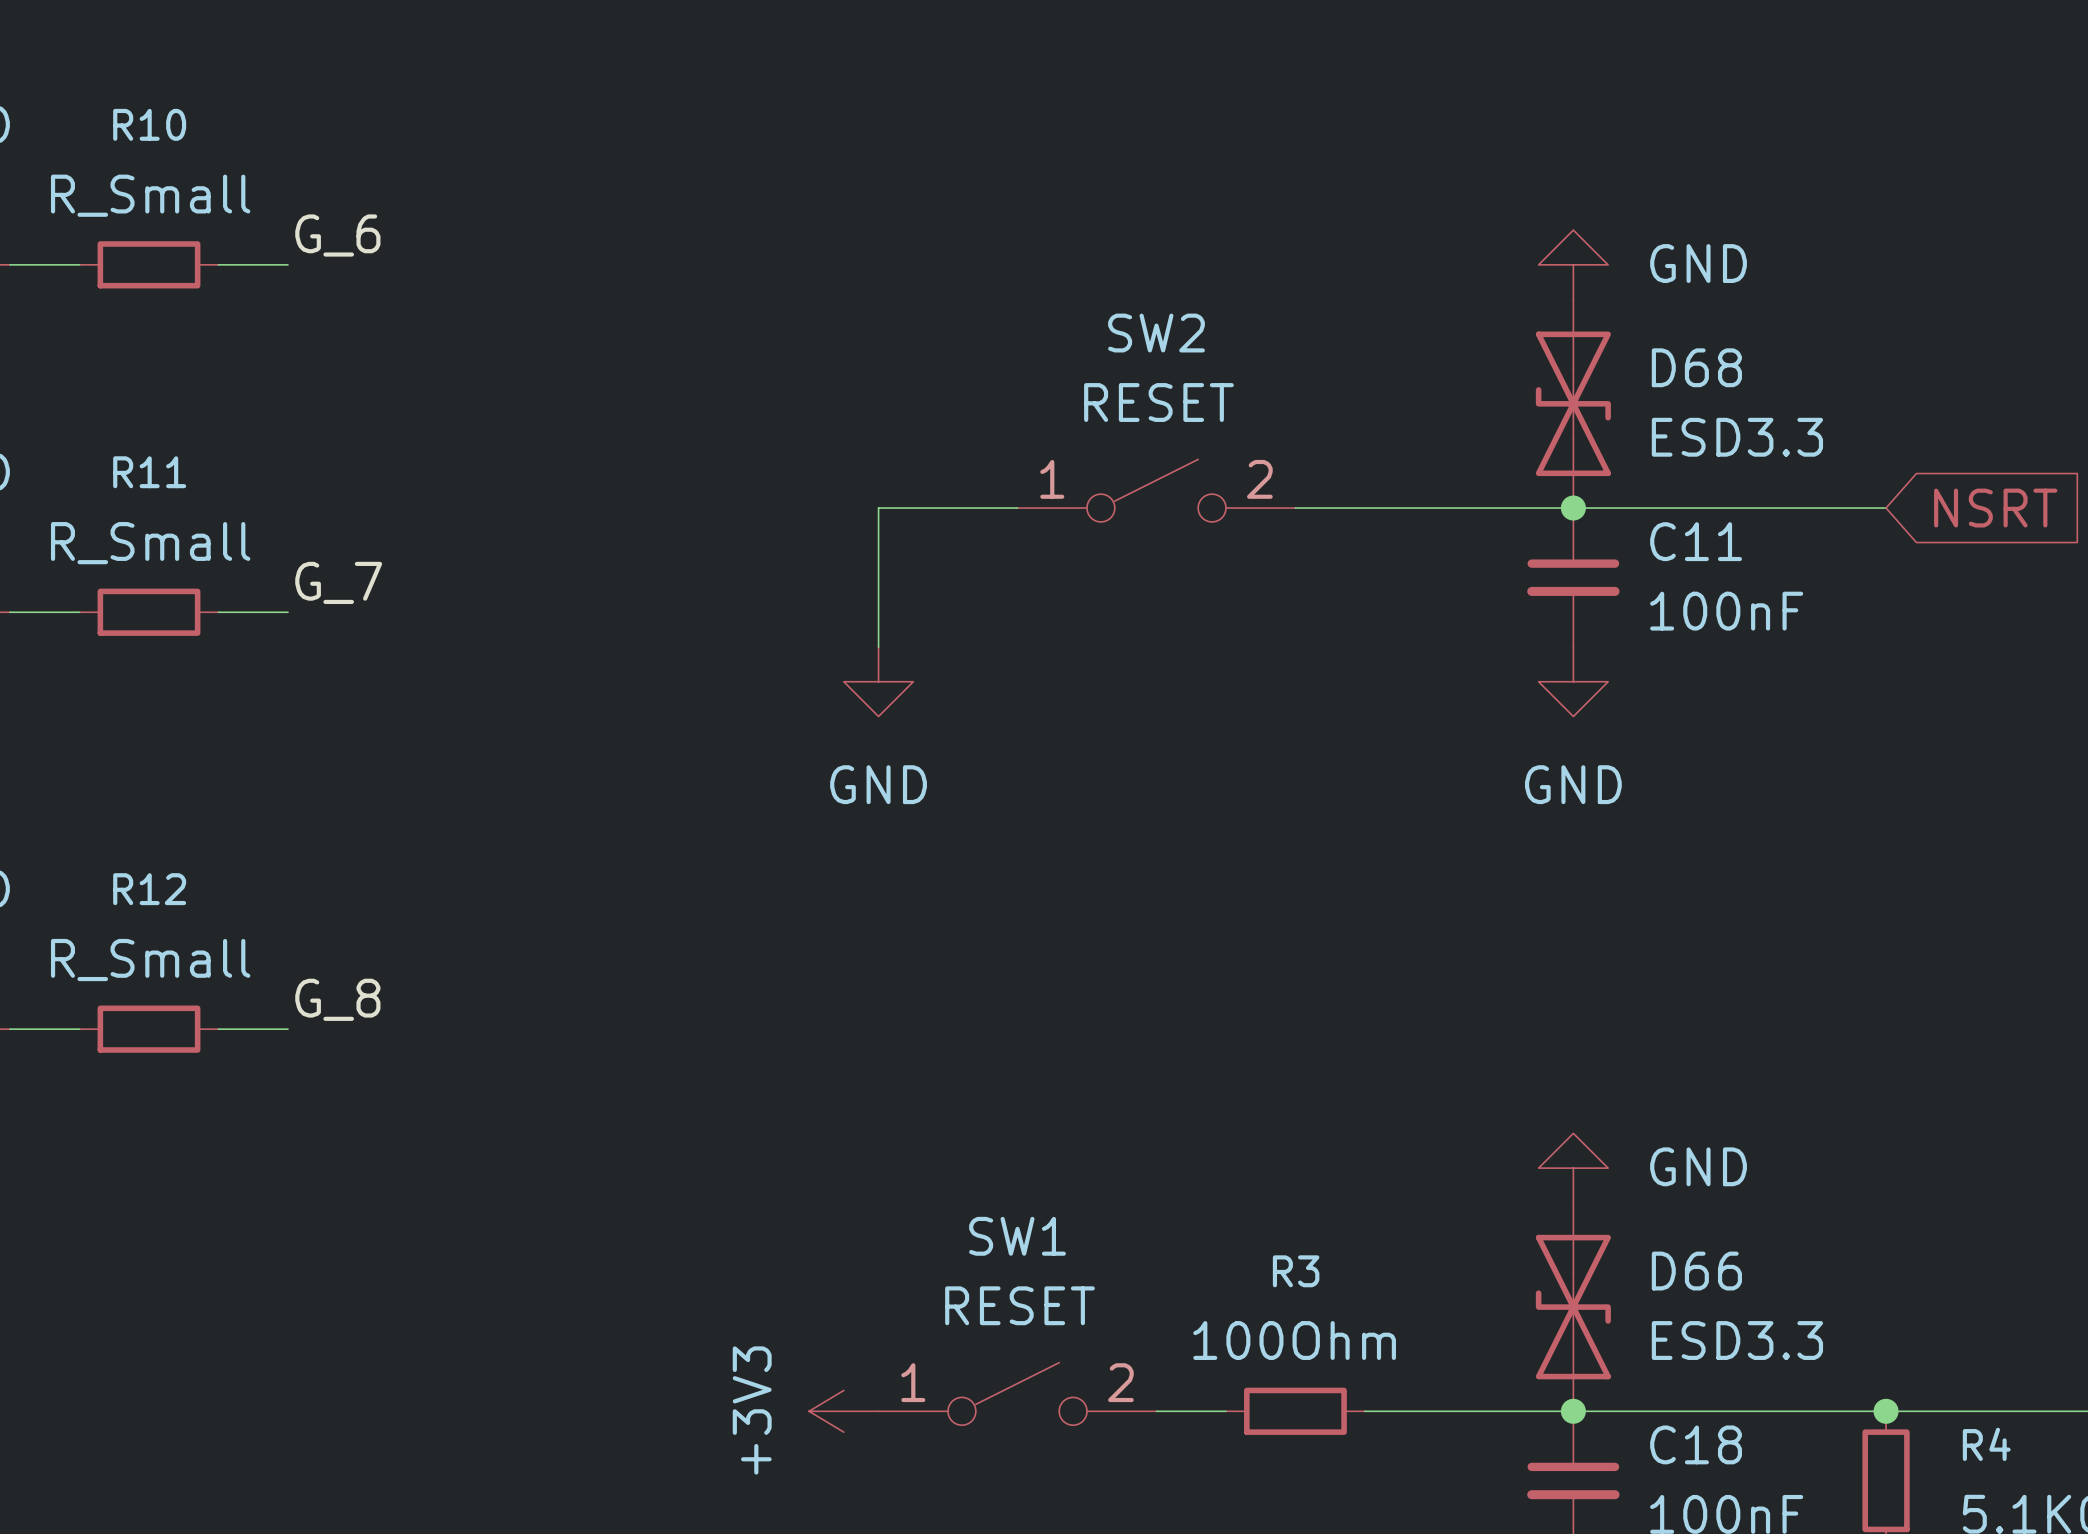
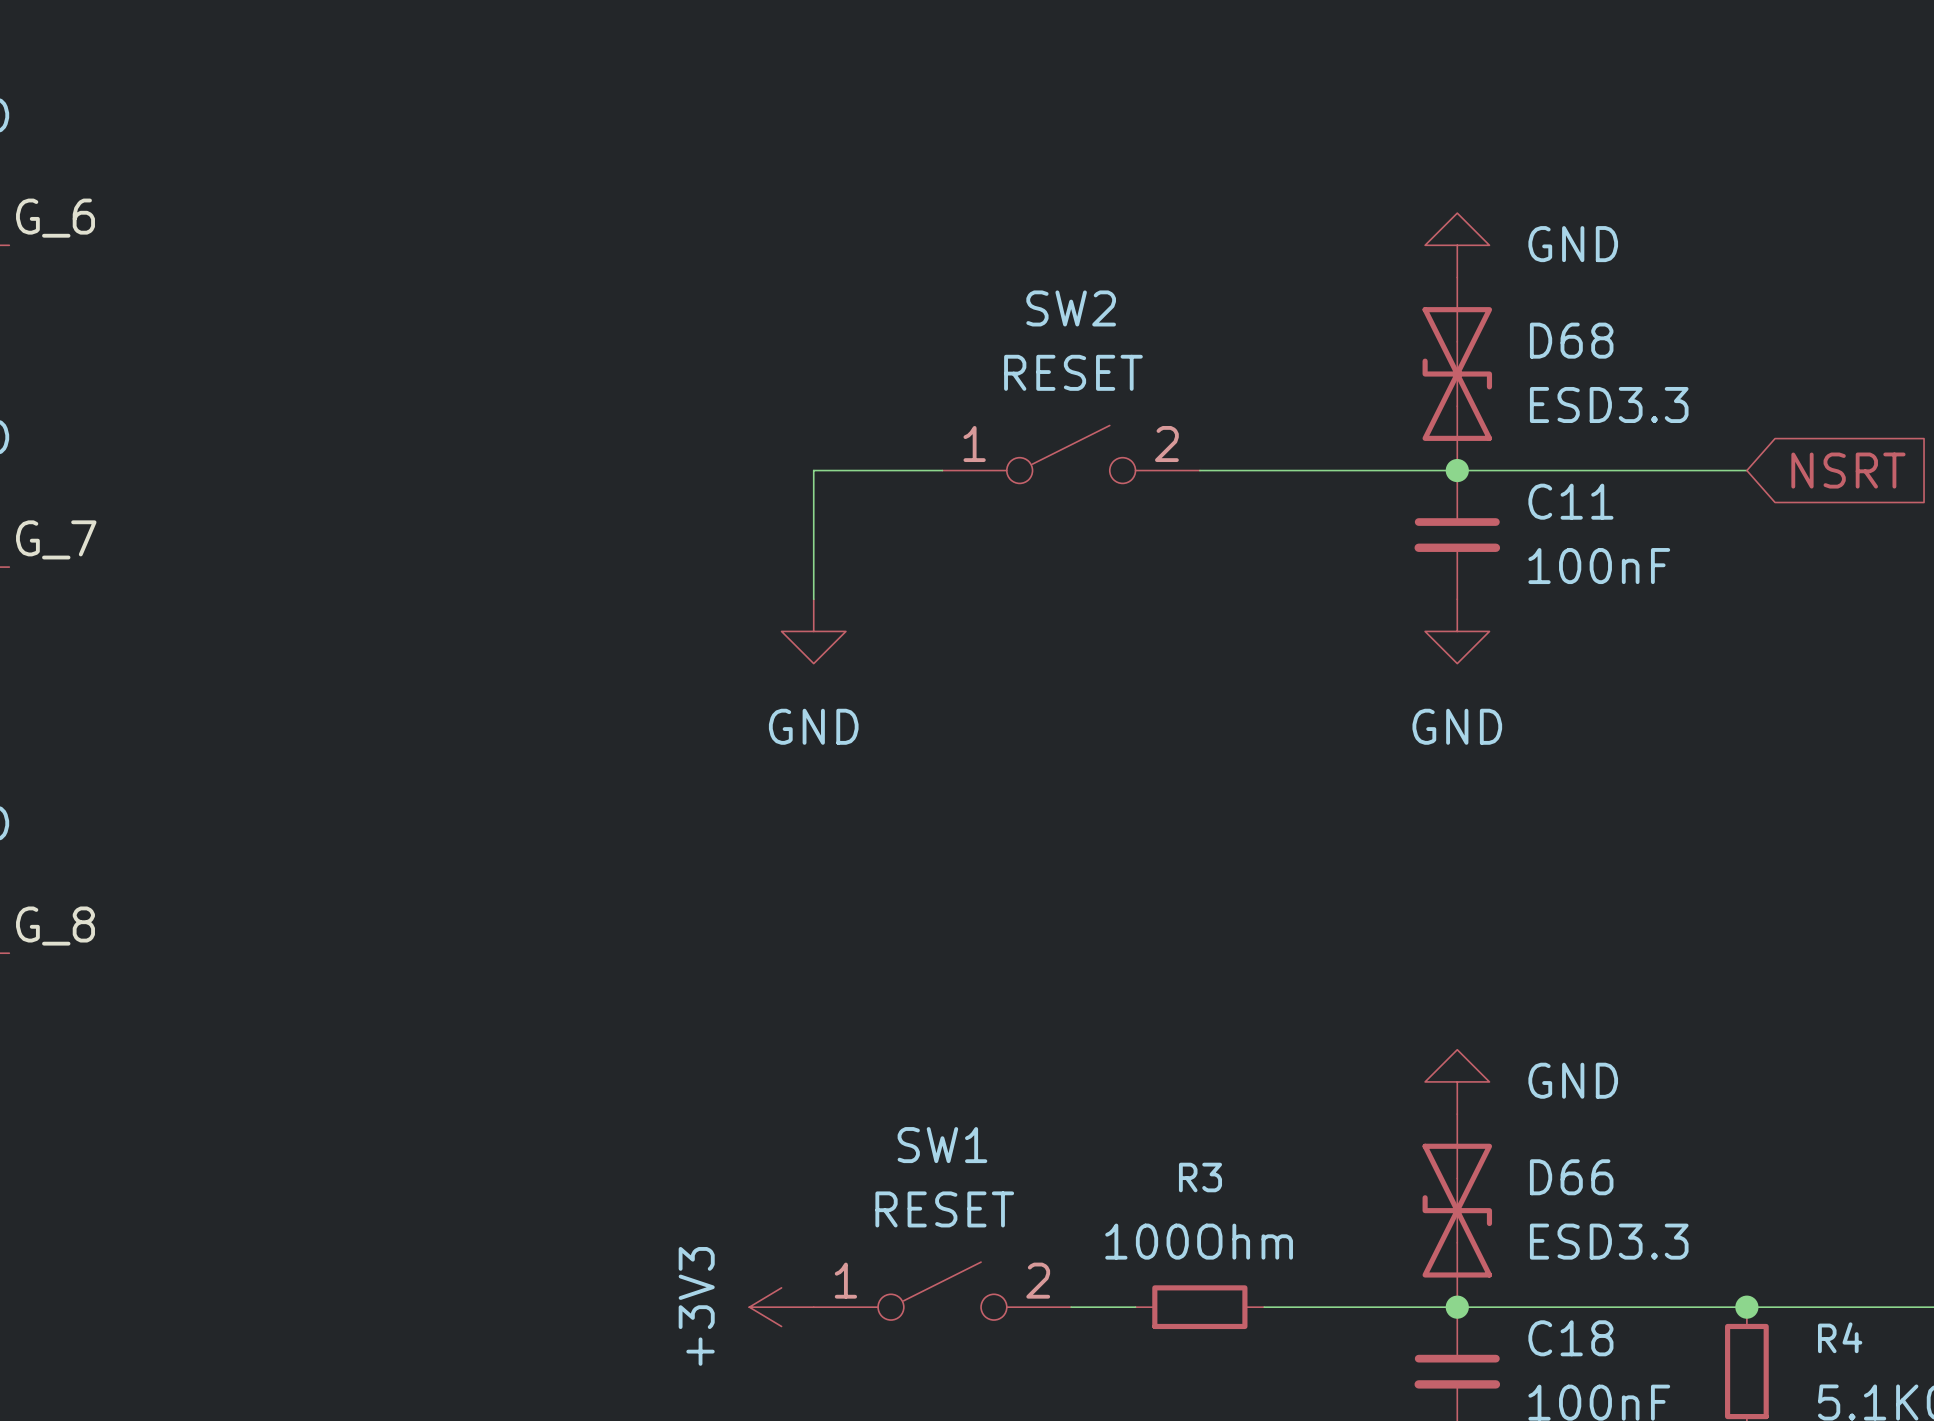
label position: G_6 (337, 235) -> G_6 (55, 218)
wire: (10, 264) (79, 264) -> none
R10: R_Small (149, 264) -> none
wire: (218, 264) (287, 264) -> none
label position: G_7 (338, 582) -> G_7 (56, 539)
wire: (10, 612) (79, 612) -> none
R11: R_Small (149, 612) -> none
wire: (218, 612) (287, 612) -> none
label position: G_8 (337, 999) -> G_8 (55, 926)
wire: (10, 1029) (79, 1029) -> none
R12: R_Small (149, 1029) -> none
wire: (218, 1029) (287, 1029) -> none

